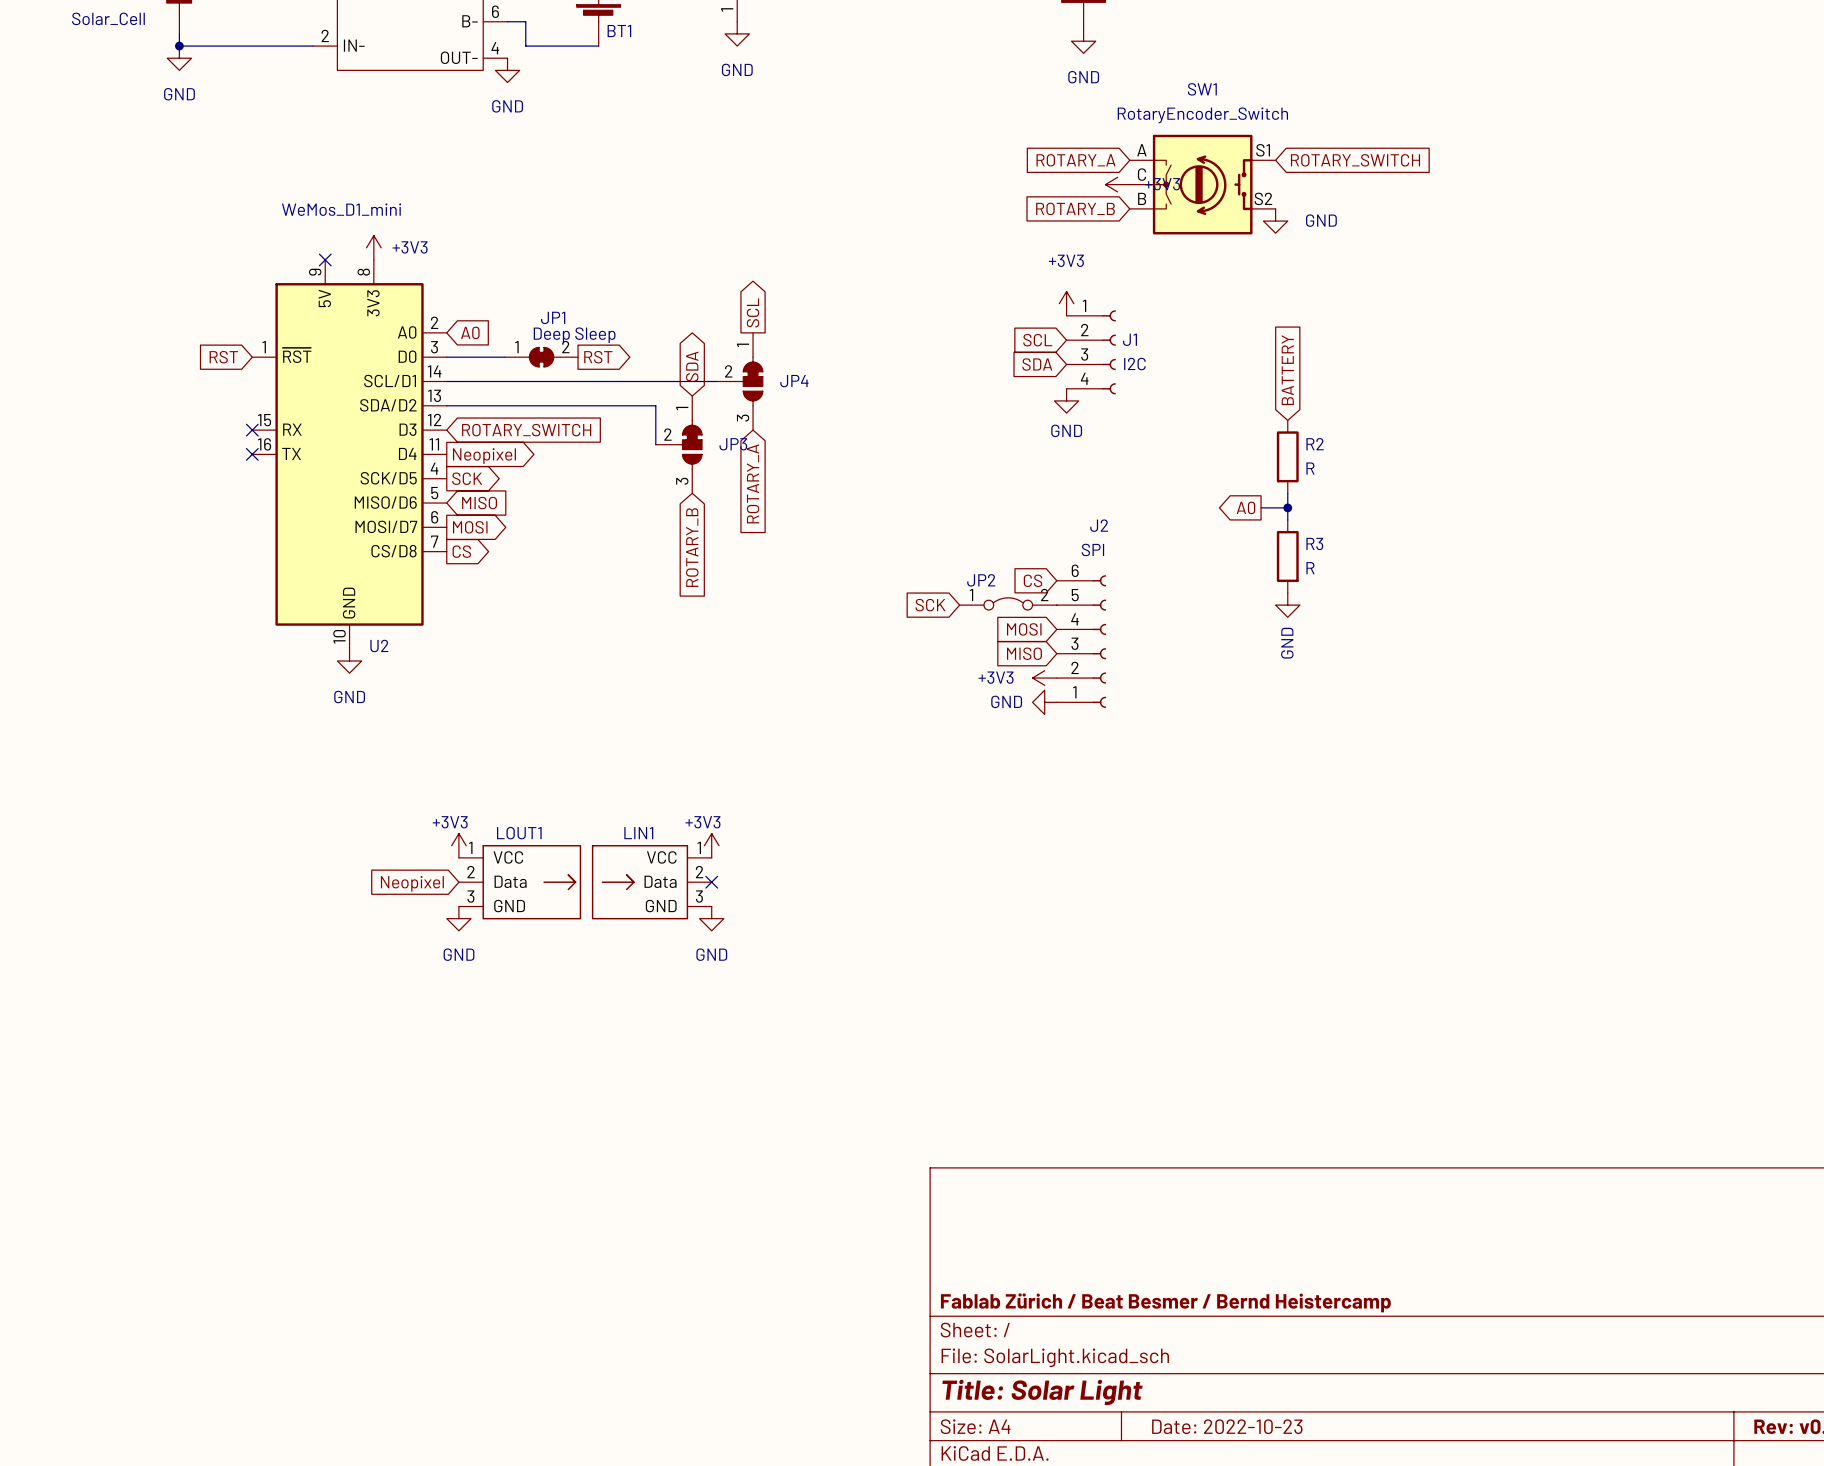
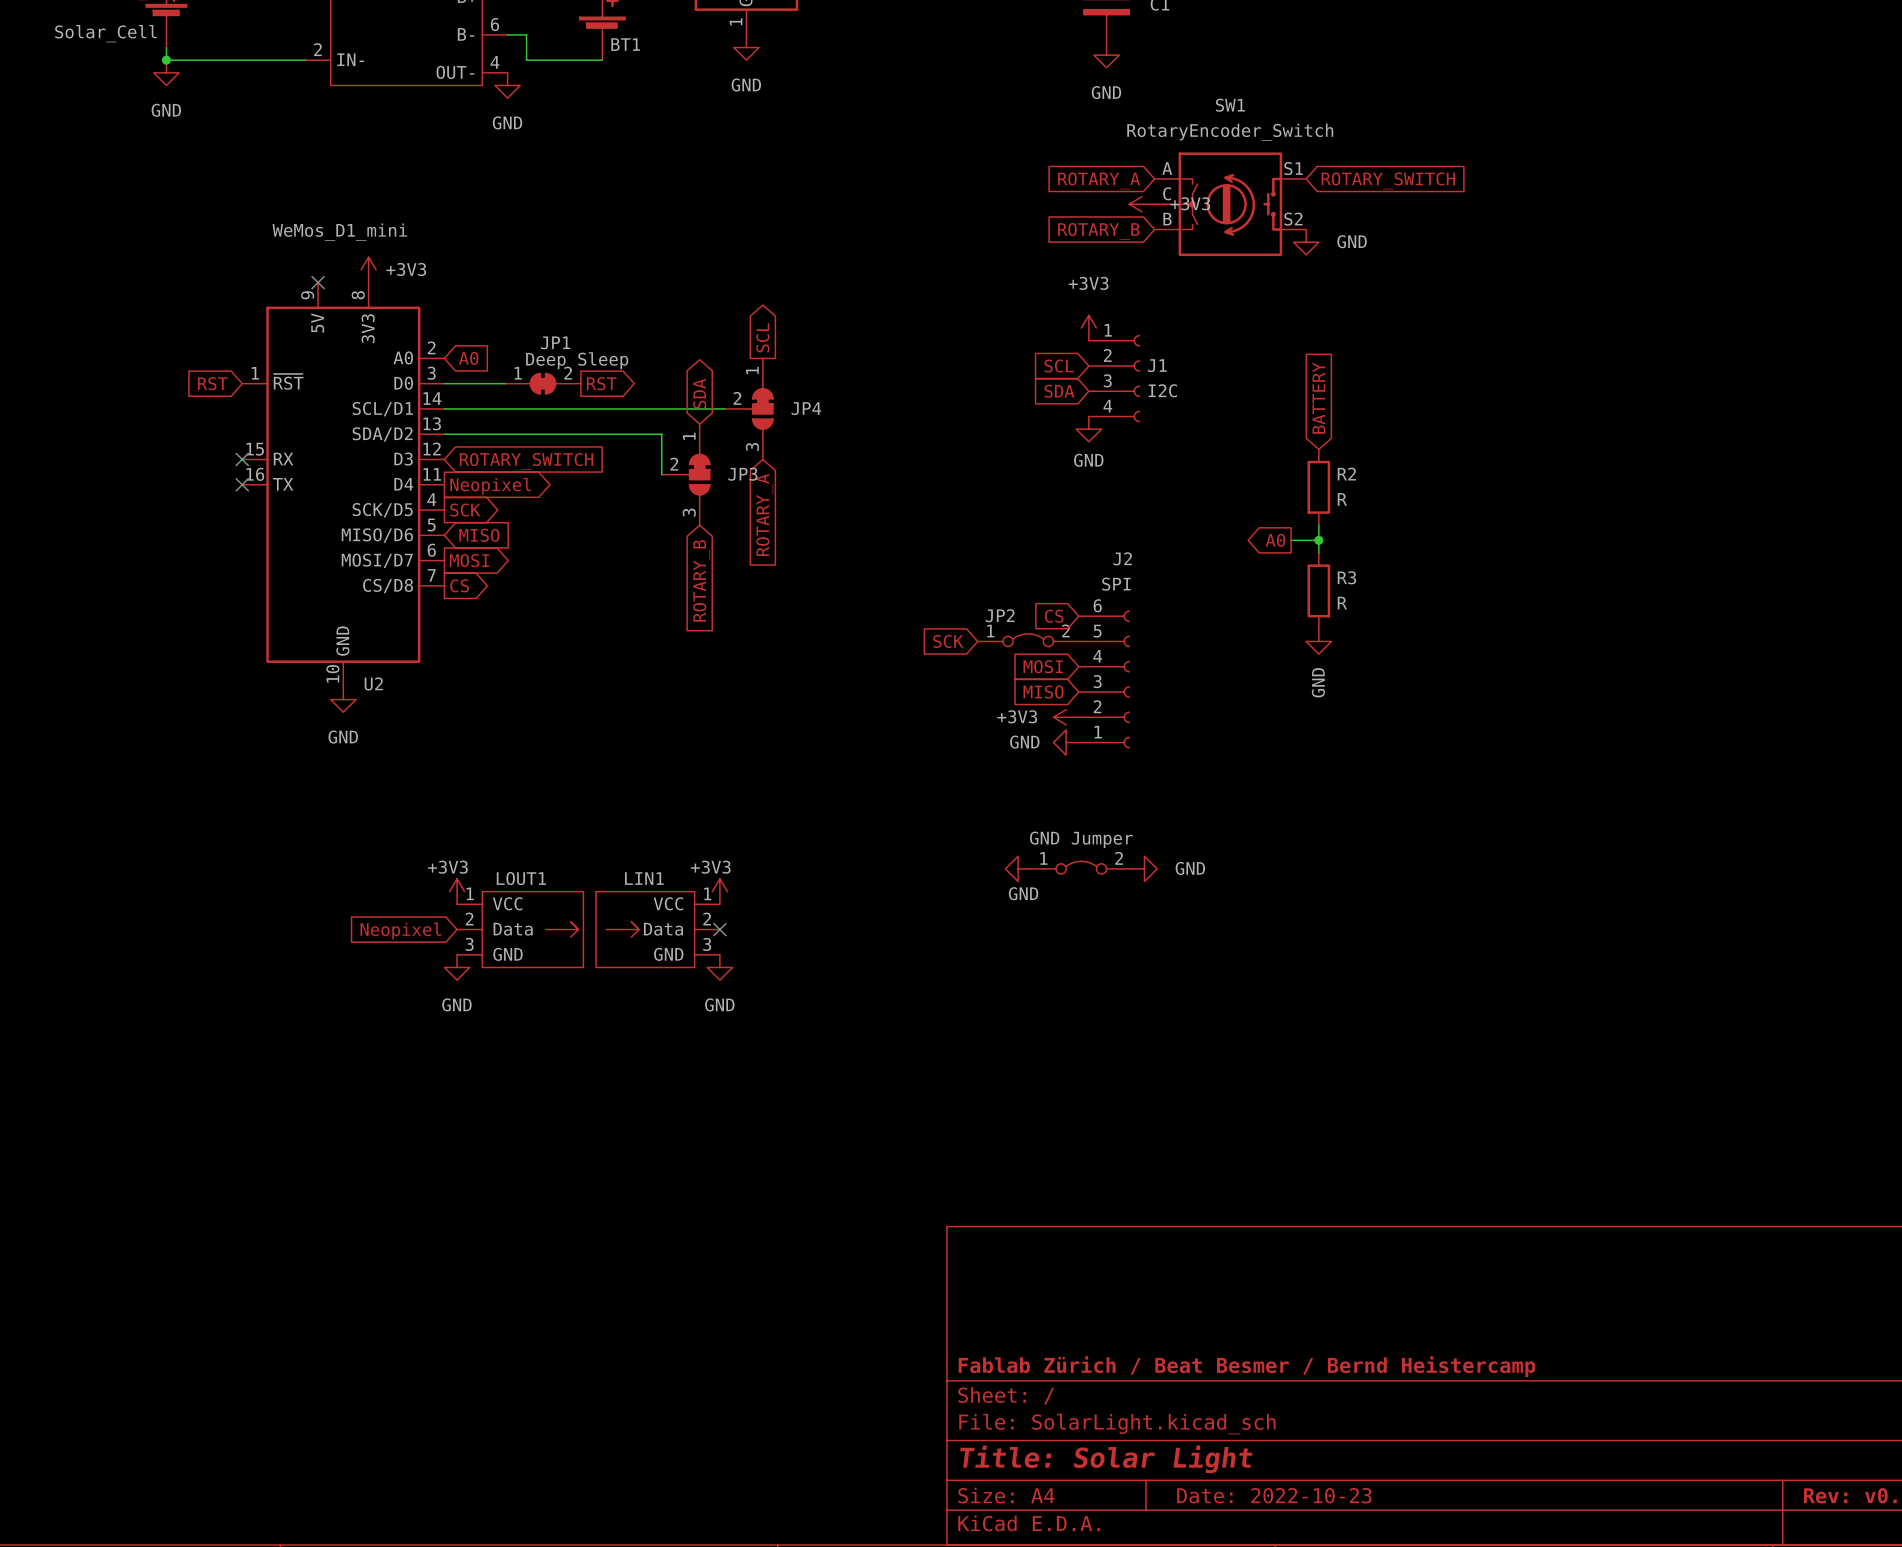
part: none -> GND Jumper (1081, 867)
power symbol: none -> GND (1018, 868)
power symbol: none -> GND (1144, 868)

